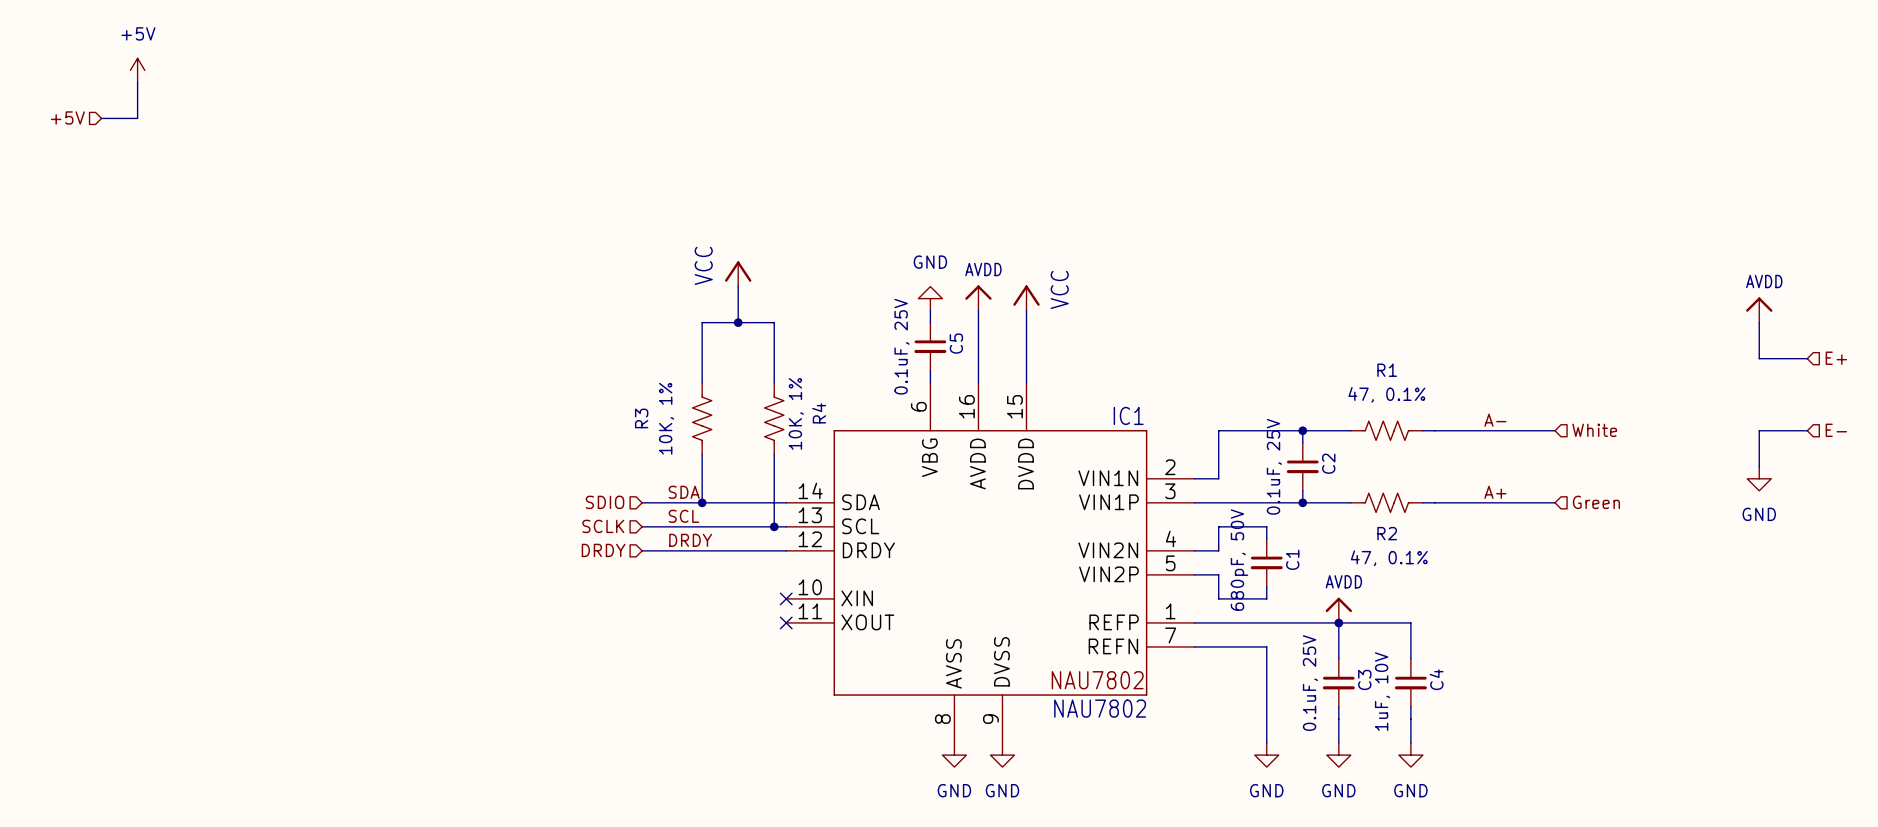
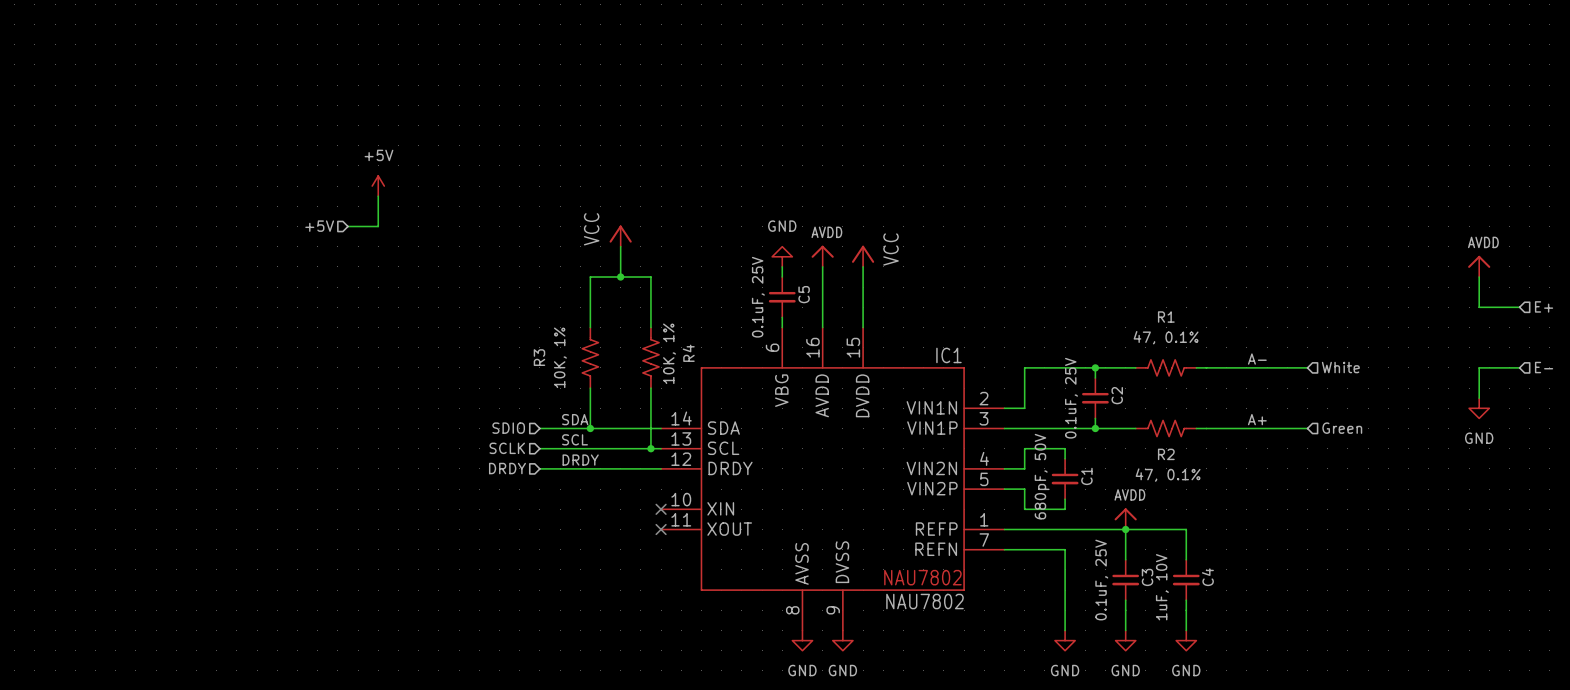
power symbol: +5V (137, 70) -> none
wire: (137, 82) (137, 118) (101, 118) -> none
hierarchical label: +5V (67, 117) -> none
power symbol: none -> +5V (378, 186)
wire: none -> (378, 196) (378, 226) (347, 226)
hierarchical label: none -> +5V (319, 226)

